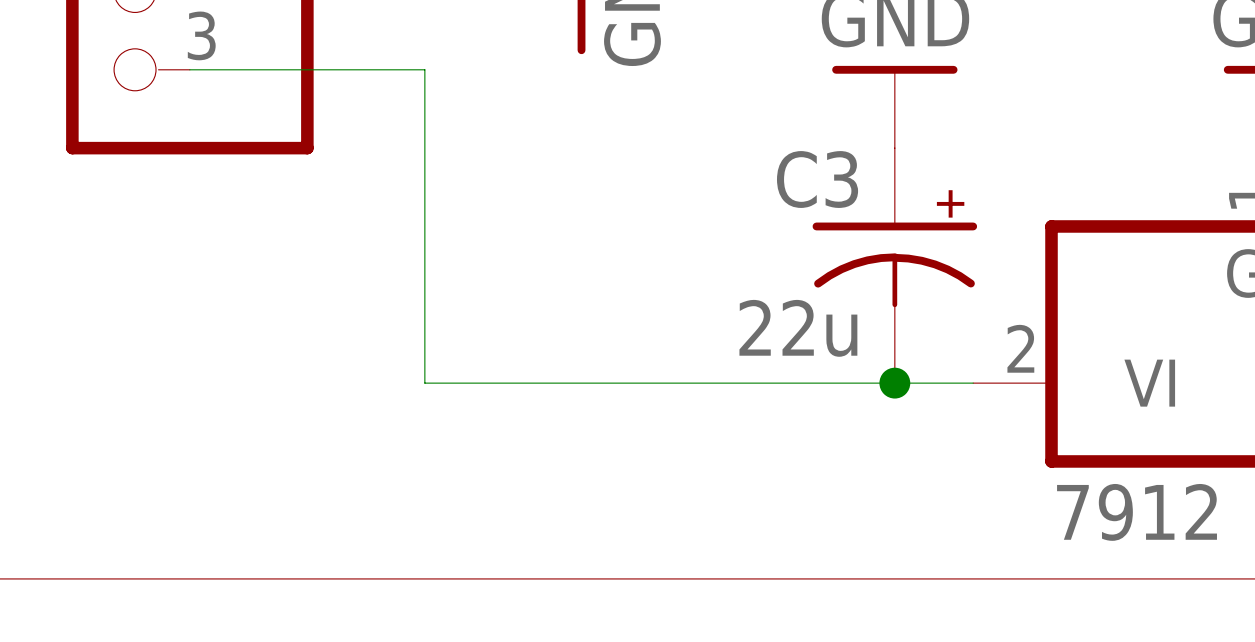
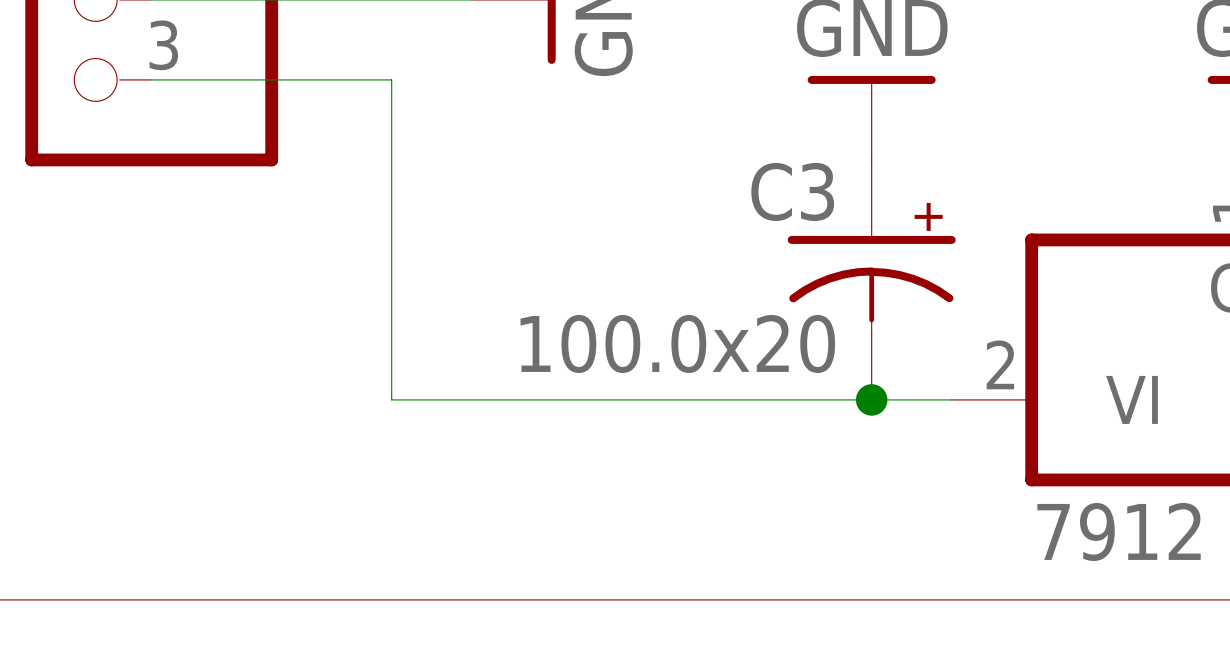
C3 value: 22u (798, 328) -> 100.0x20 (677, 343)

